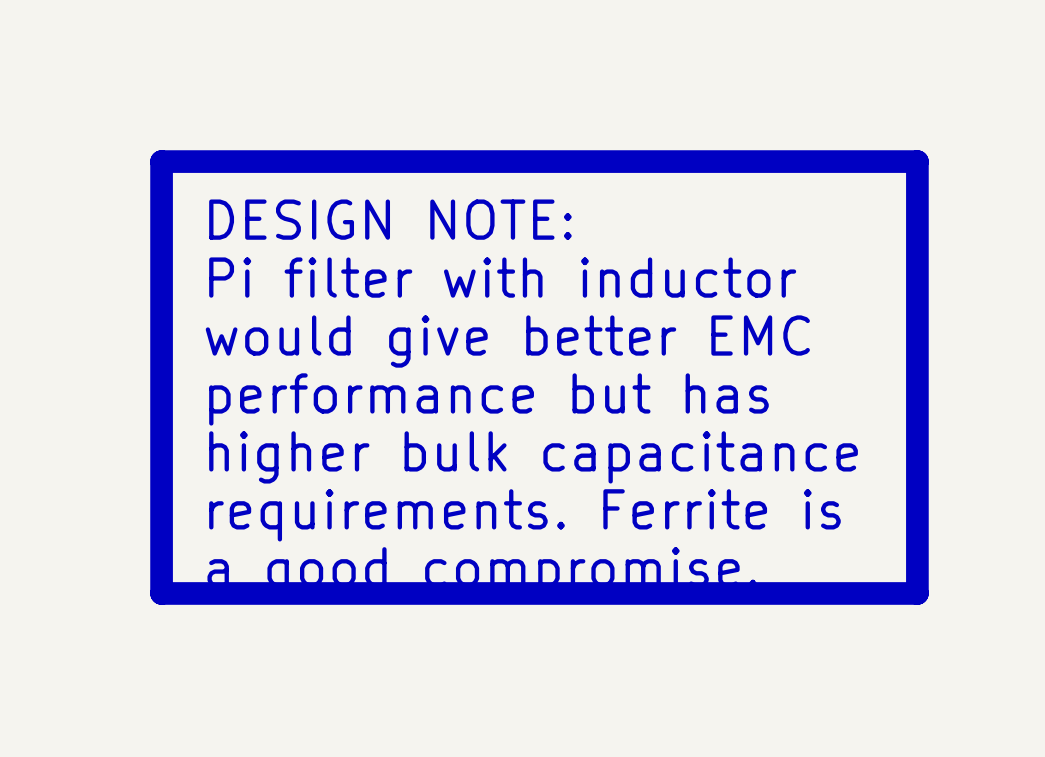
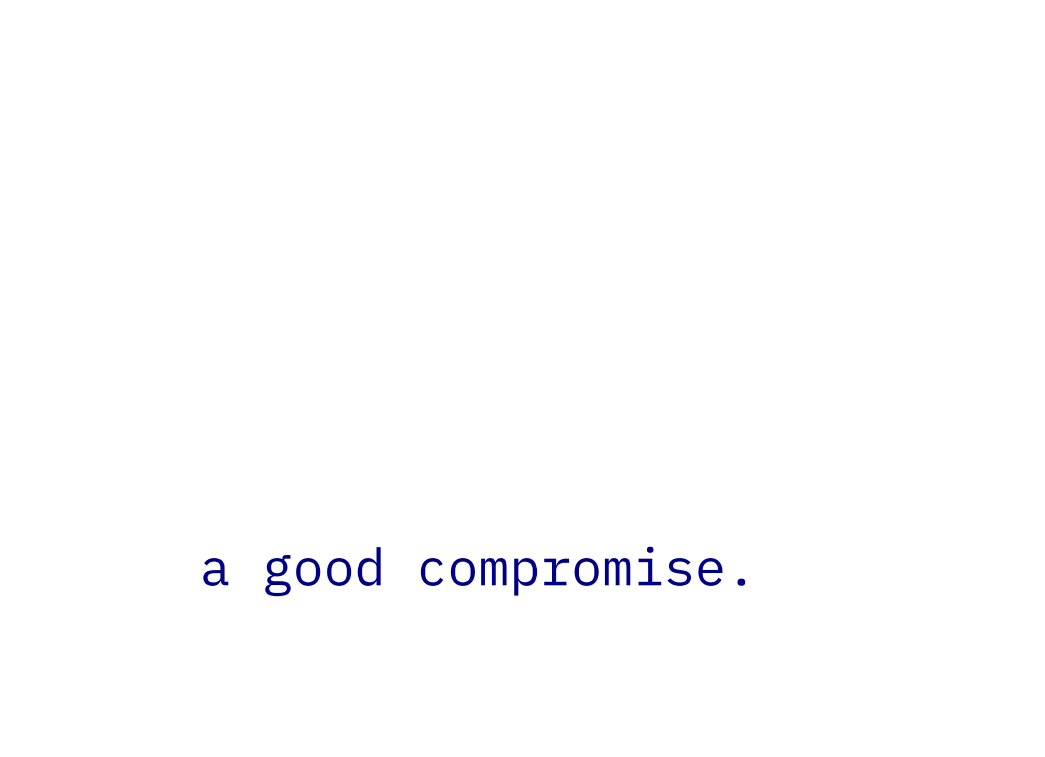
line: (161, 161) (917, 161) (917, 593) (161, 593) (161, 161) -> none
text: DESIGN NOTE: (390, 219) -> none
text: Pi filter with inductor (502, 277) -> none
text: would give better EMC (507, 341) -> none
text: performance but has (488, 399) -> none
text: higher bulk capacitance (533, 457) -> none
text: requirements. Ferrite is (524, 515) -> none

